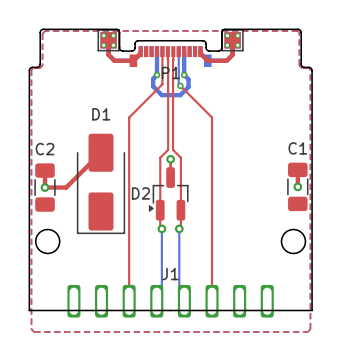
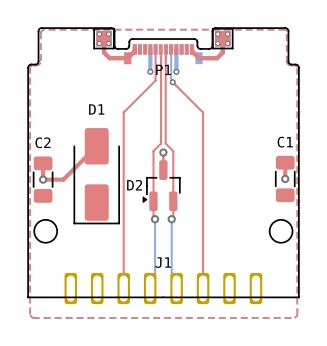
bottom track: (157, 75) (153, 78) (153, 86) (161, 95) (180, 95) (188, 86) (188, 79) (184, 75) -> none

